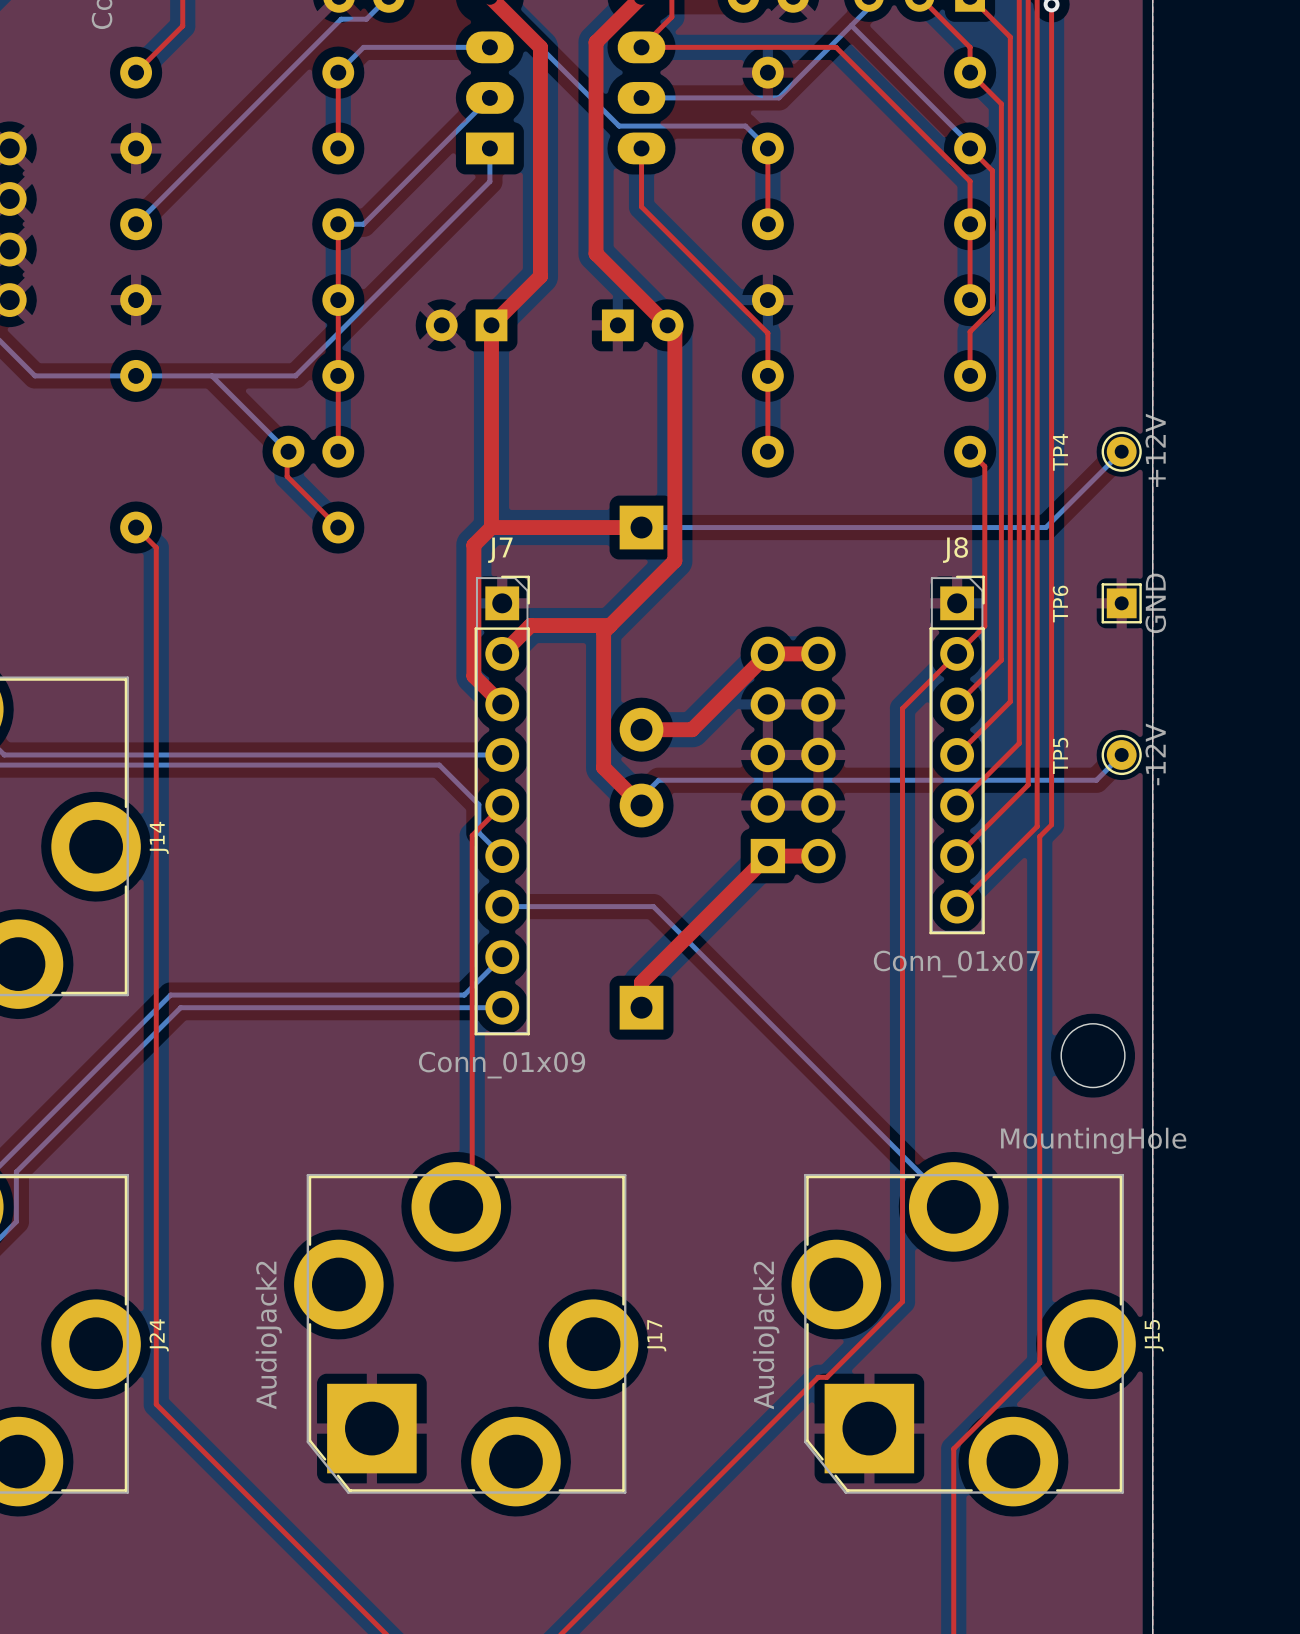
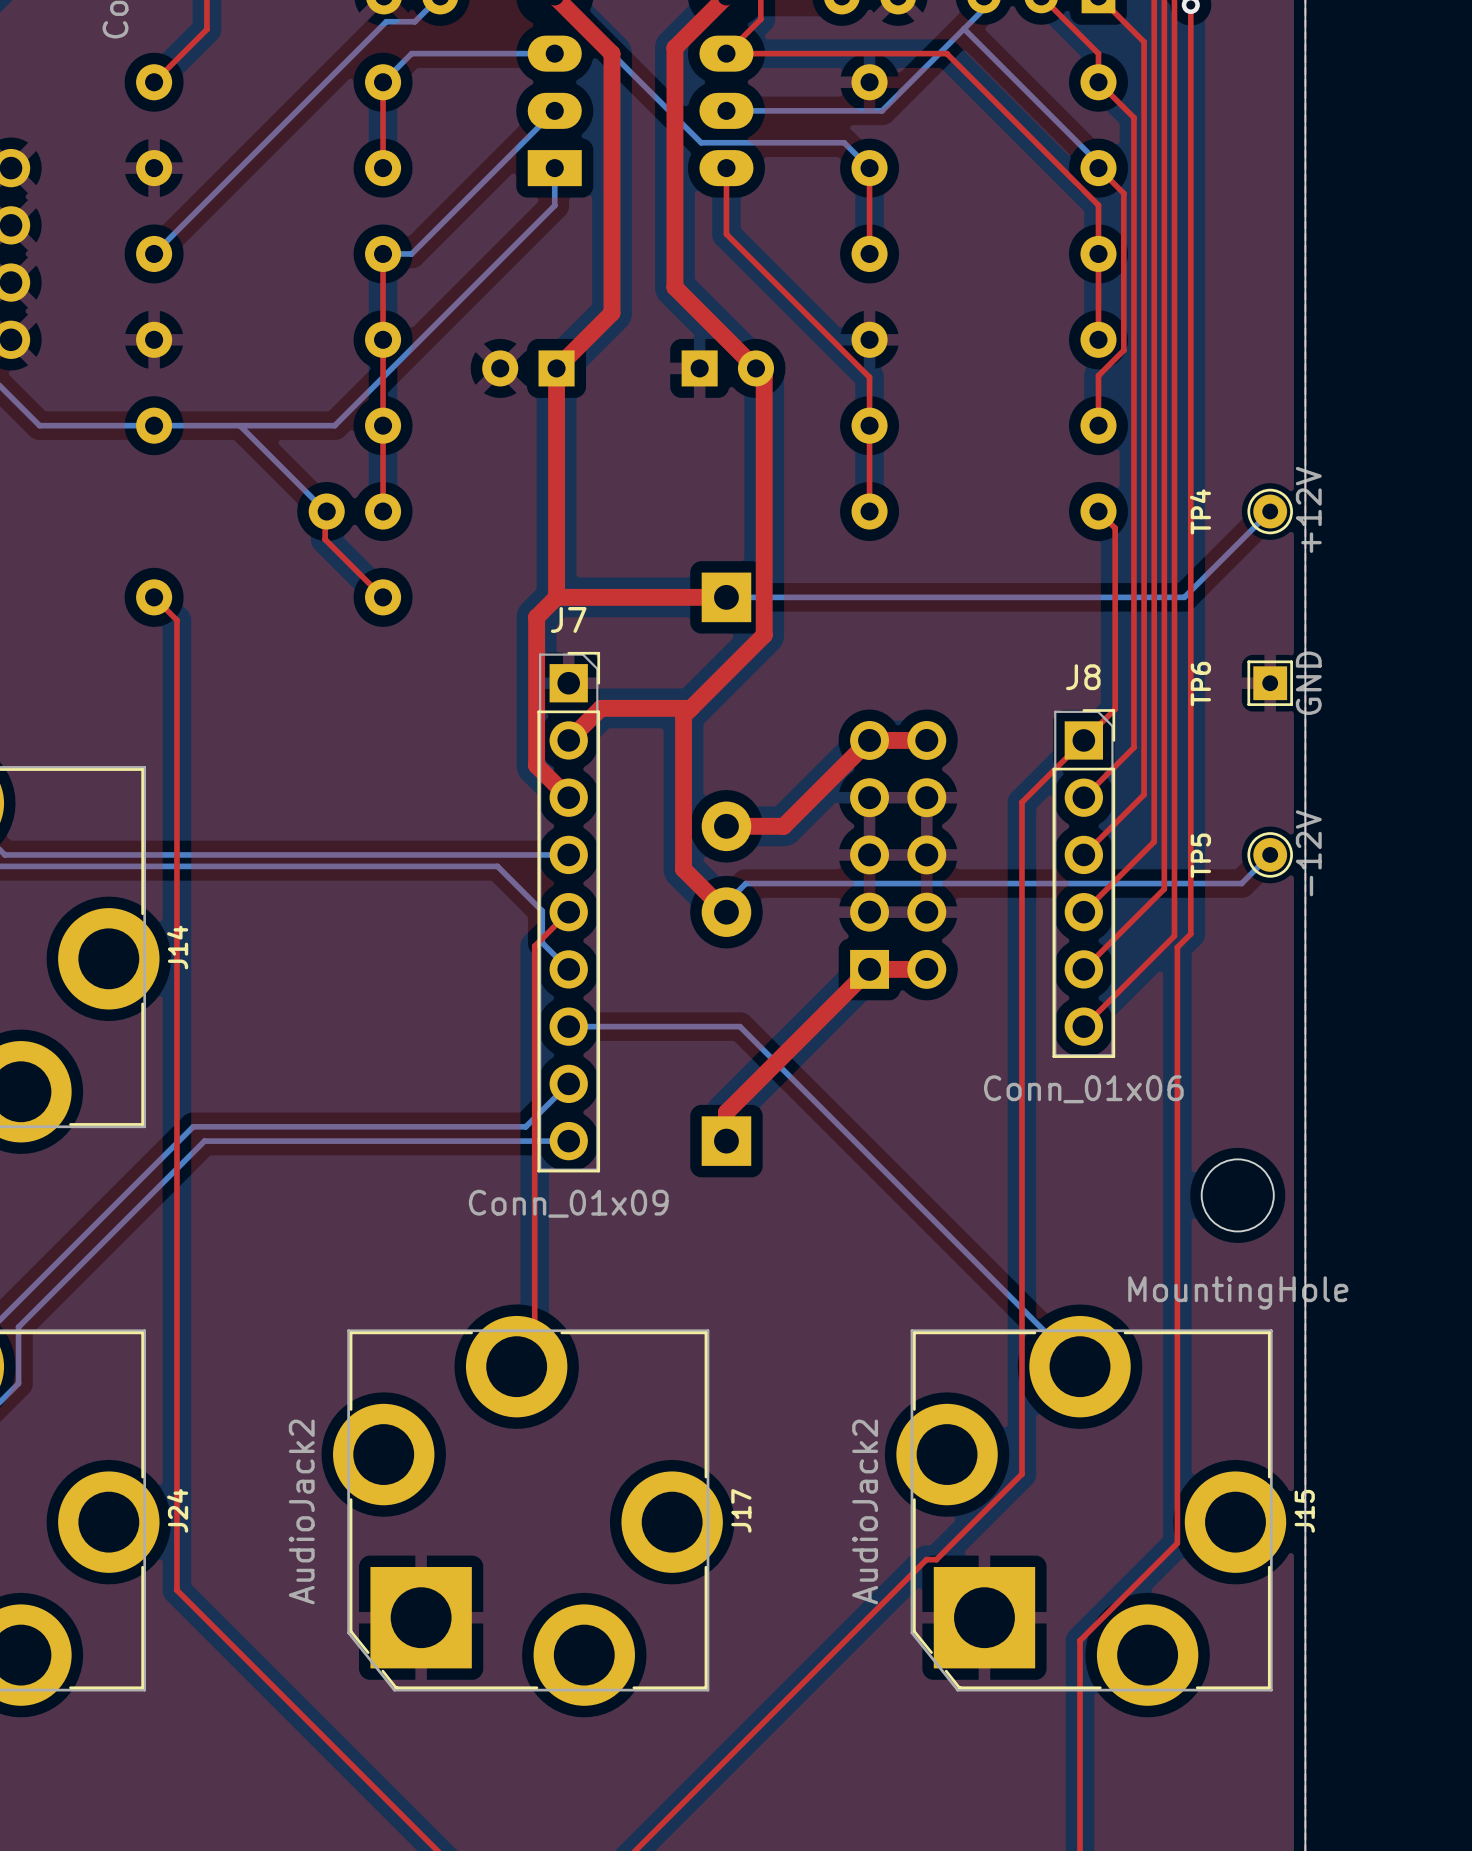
J8 footprint: [929, 575, 985, 935] -> [1052, 709, 1116, 1058]
J8 value: Conn_01x07 (956, 964) -> Conn_01x06 (1083, 1089)

